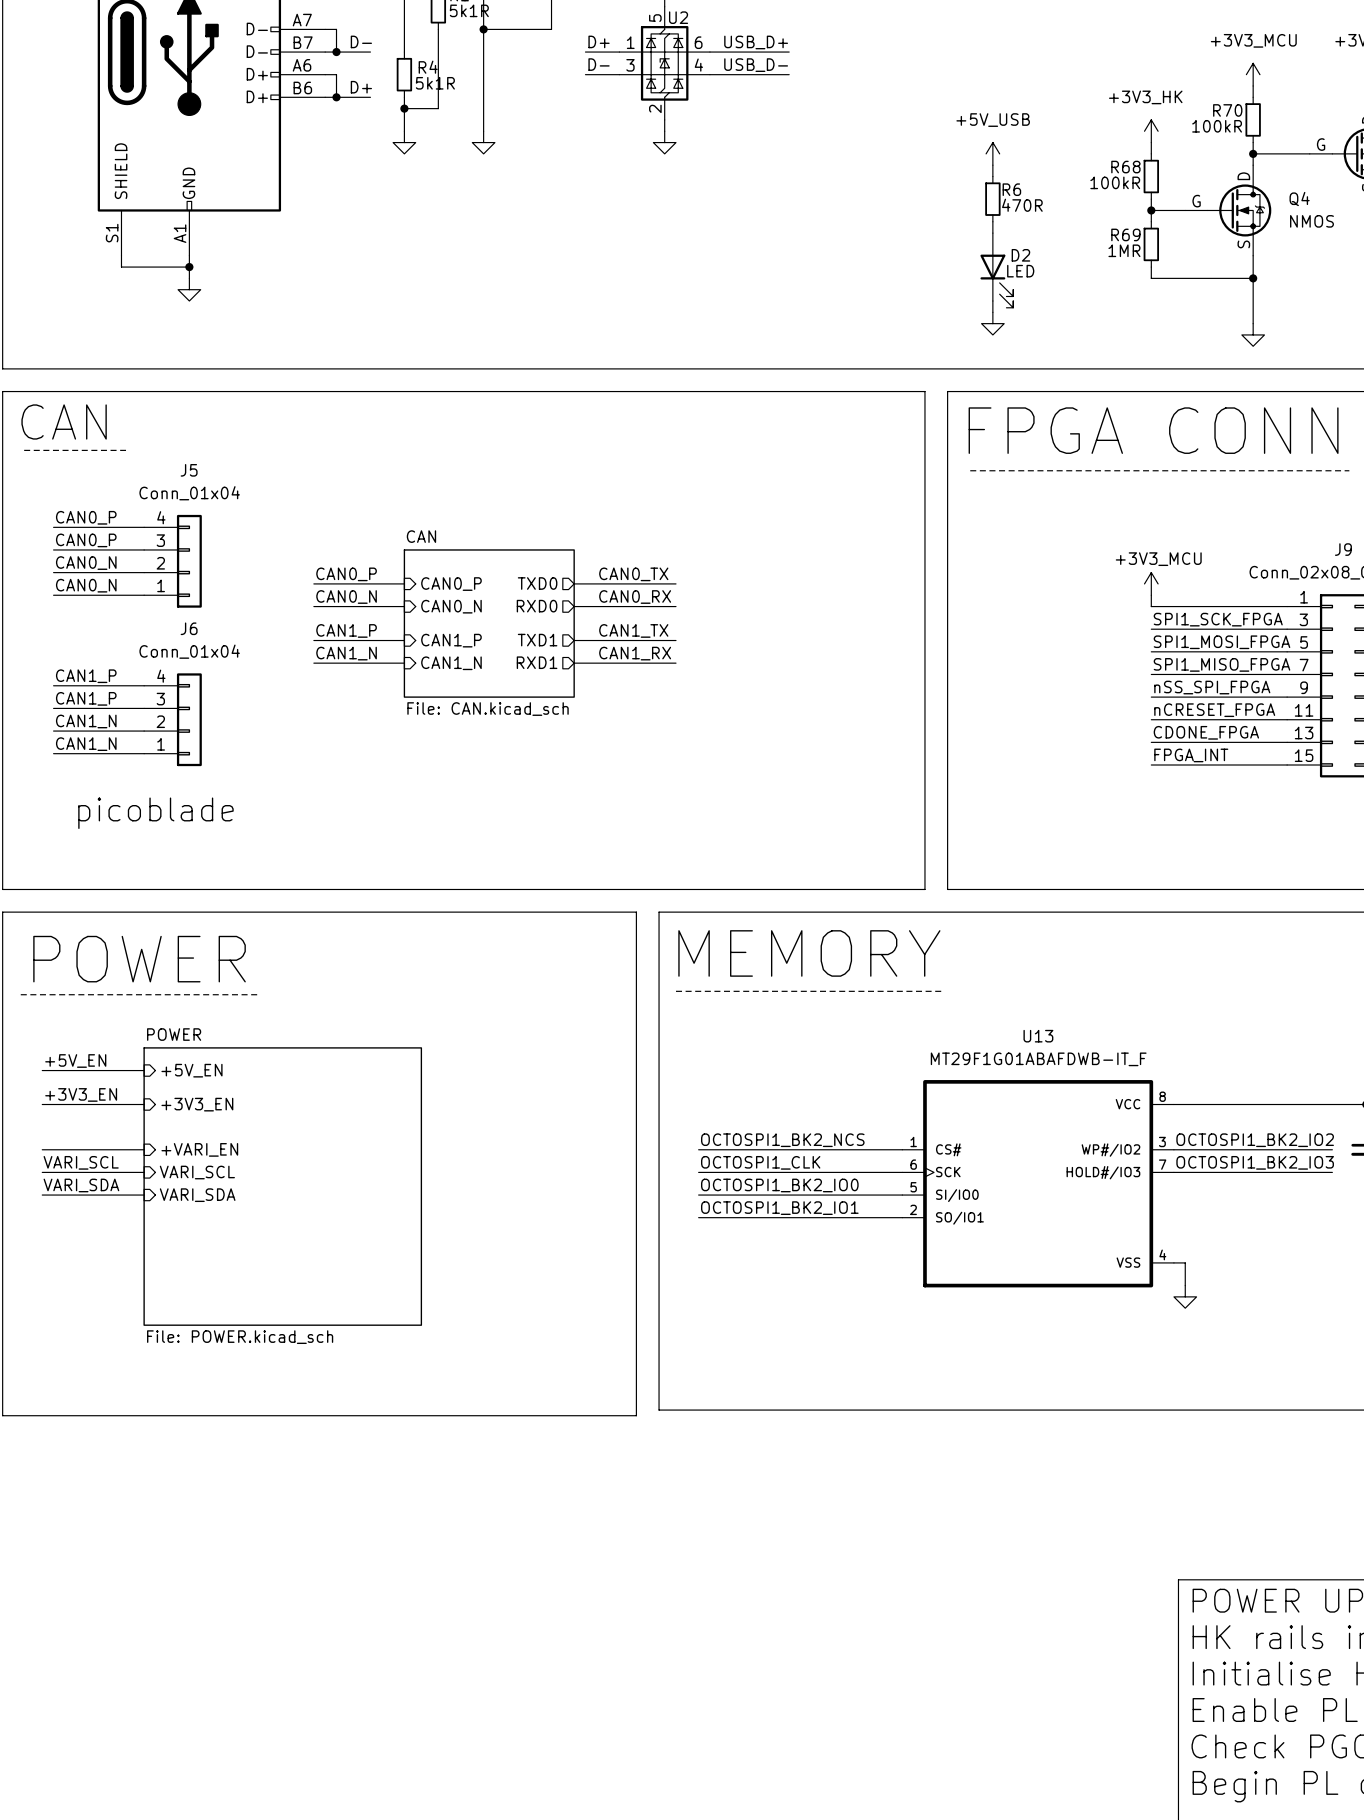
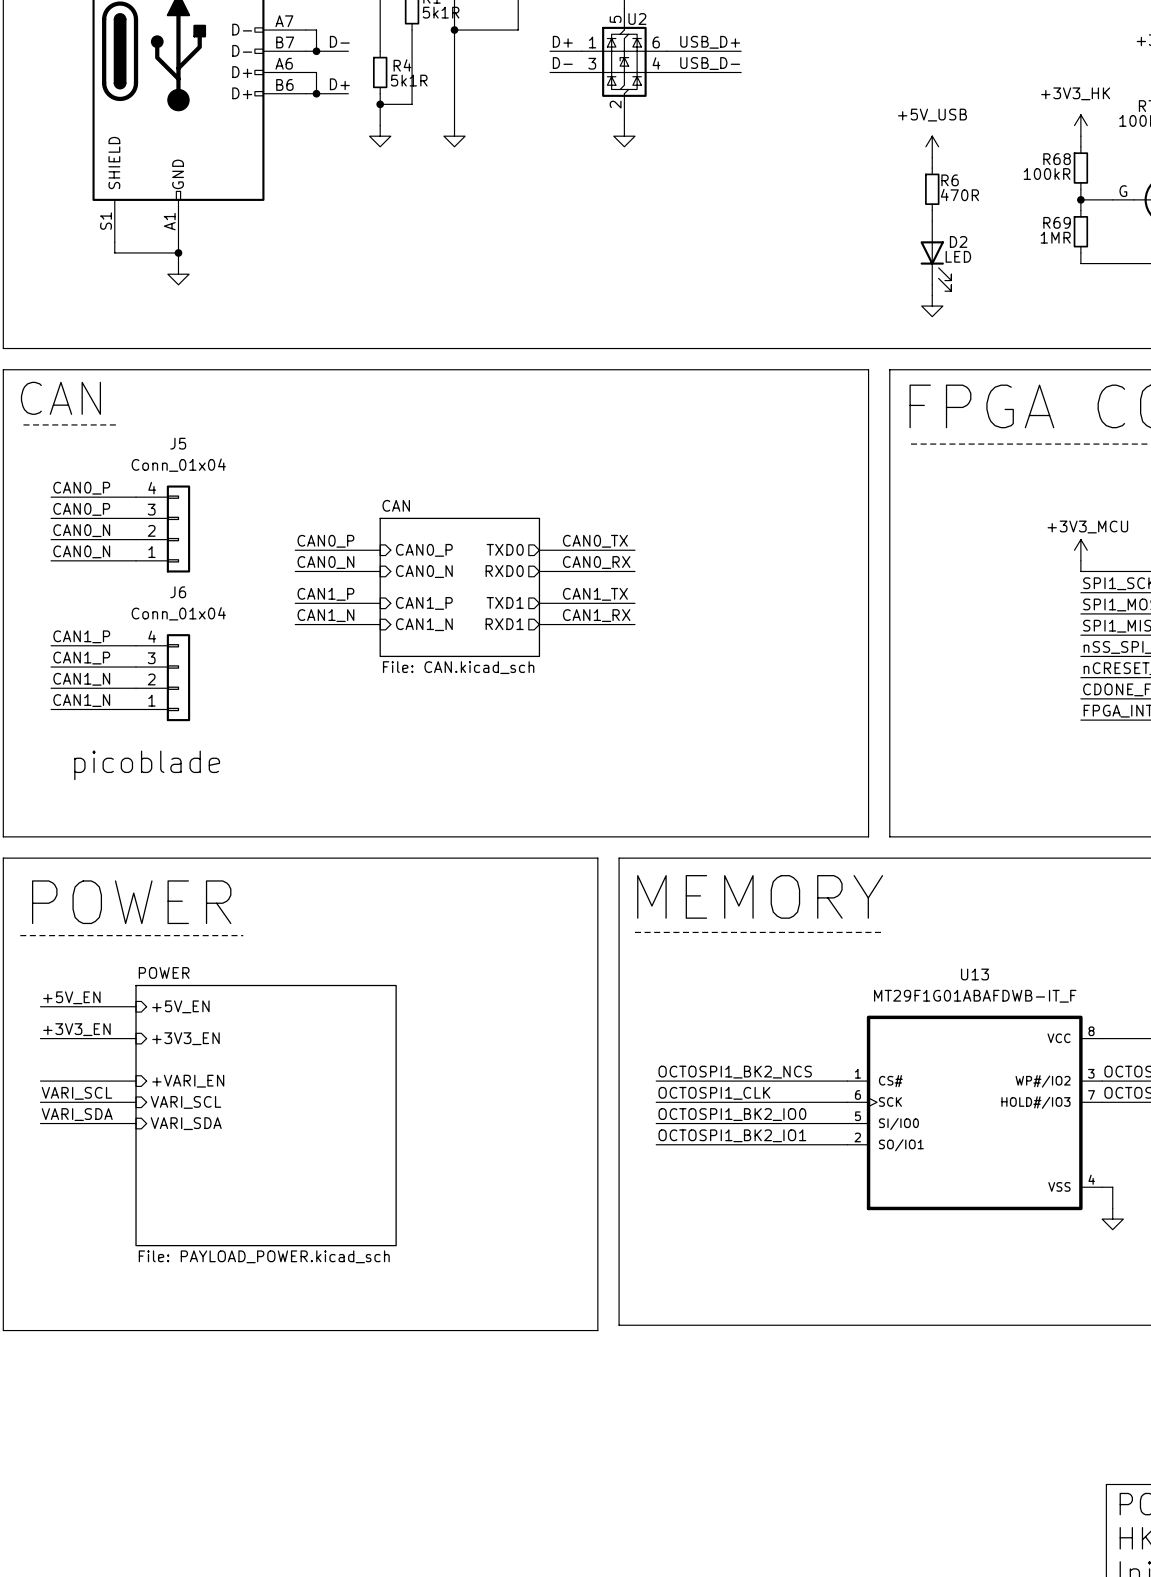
sheet POWER value: File: POWER.kicad_sch (240, 1337) -> File: PAYLOAD_POWER.kicad_sch (264, 1256)

